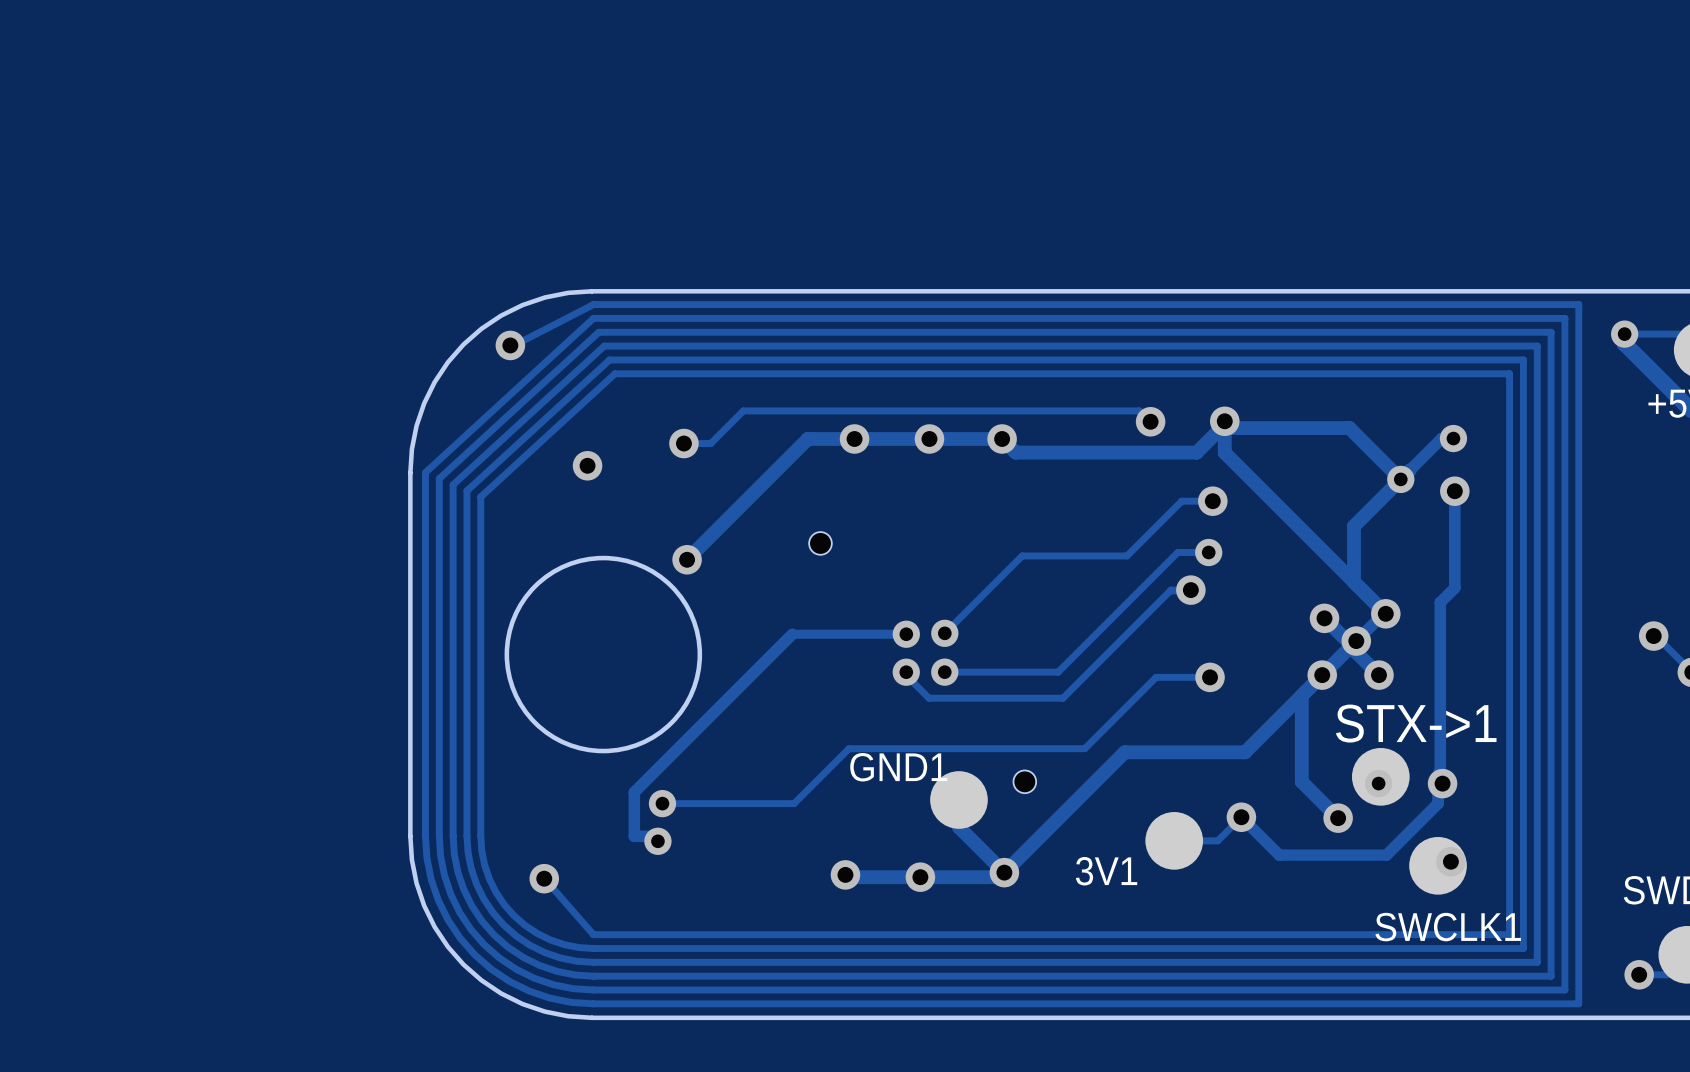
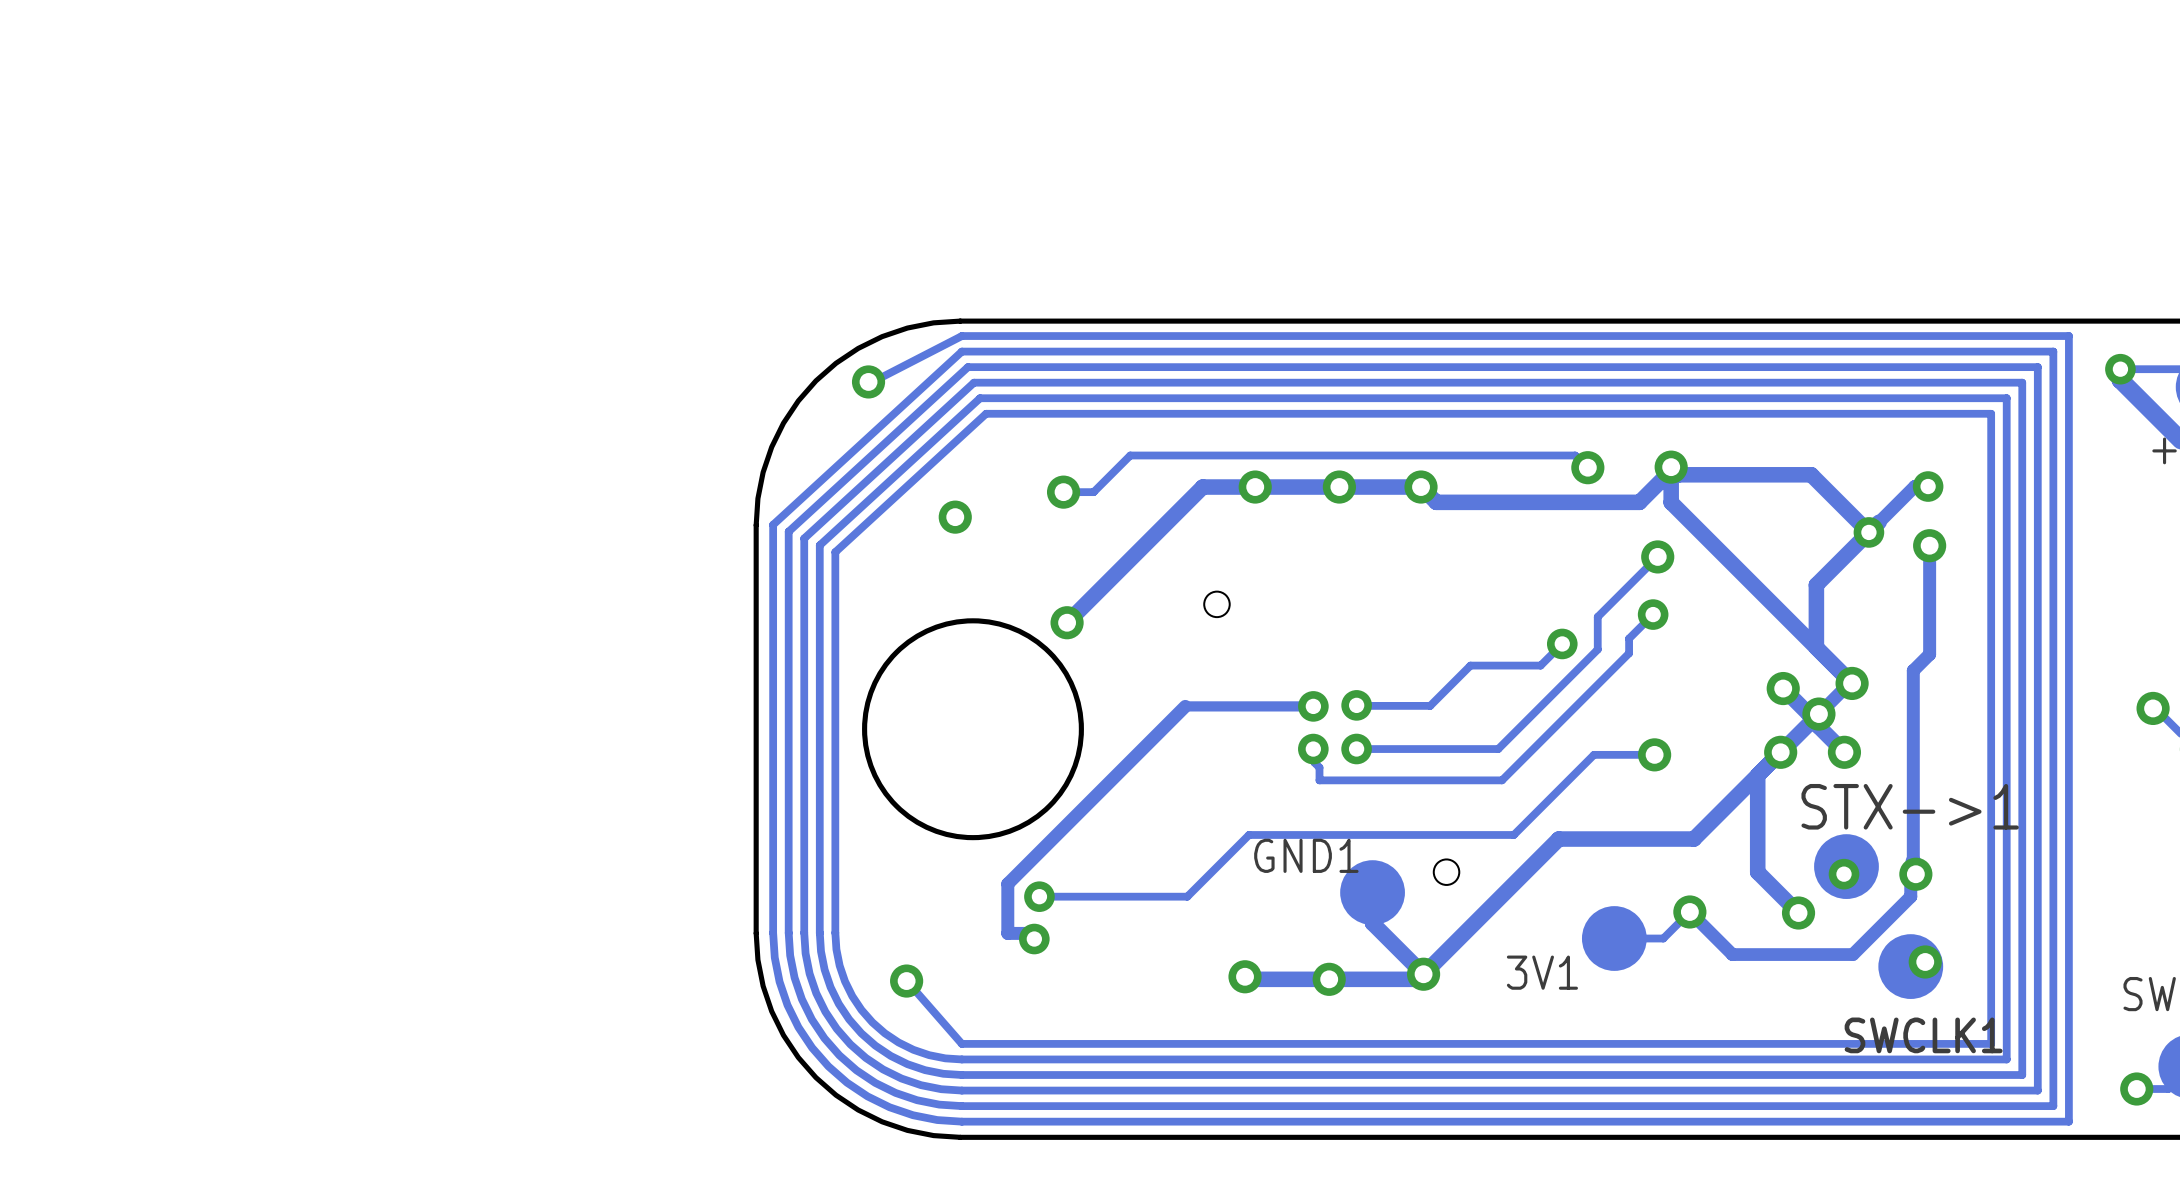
track: (1212, 501) (1181, 501) (1127, 555) (1022, 555) (944, 633) -> (1562, 643) (1540, 665) (1470, 665) (1430, 705) (1356, 705)
track: (1205, 552) (1177, 552) (1058, 672) -> (1657, 556) (1597, 616) (1597, 649) (1498, 749) (1483, 748)
via: none -> (1562, 643)
track: (1190, 590) (1171, 590) (1062, 698) (929, 698) (906, 675) (906, 672) -> (1653, 614) (1629, 638) (1629, 653) (1502, 780) (1319, 780) (1319, 767) (1314, 762) (1314, 749)
via: (1190, 590) -> none

